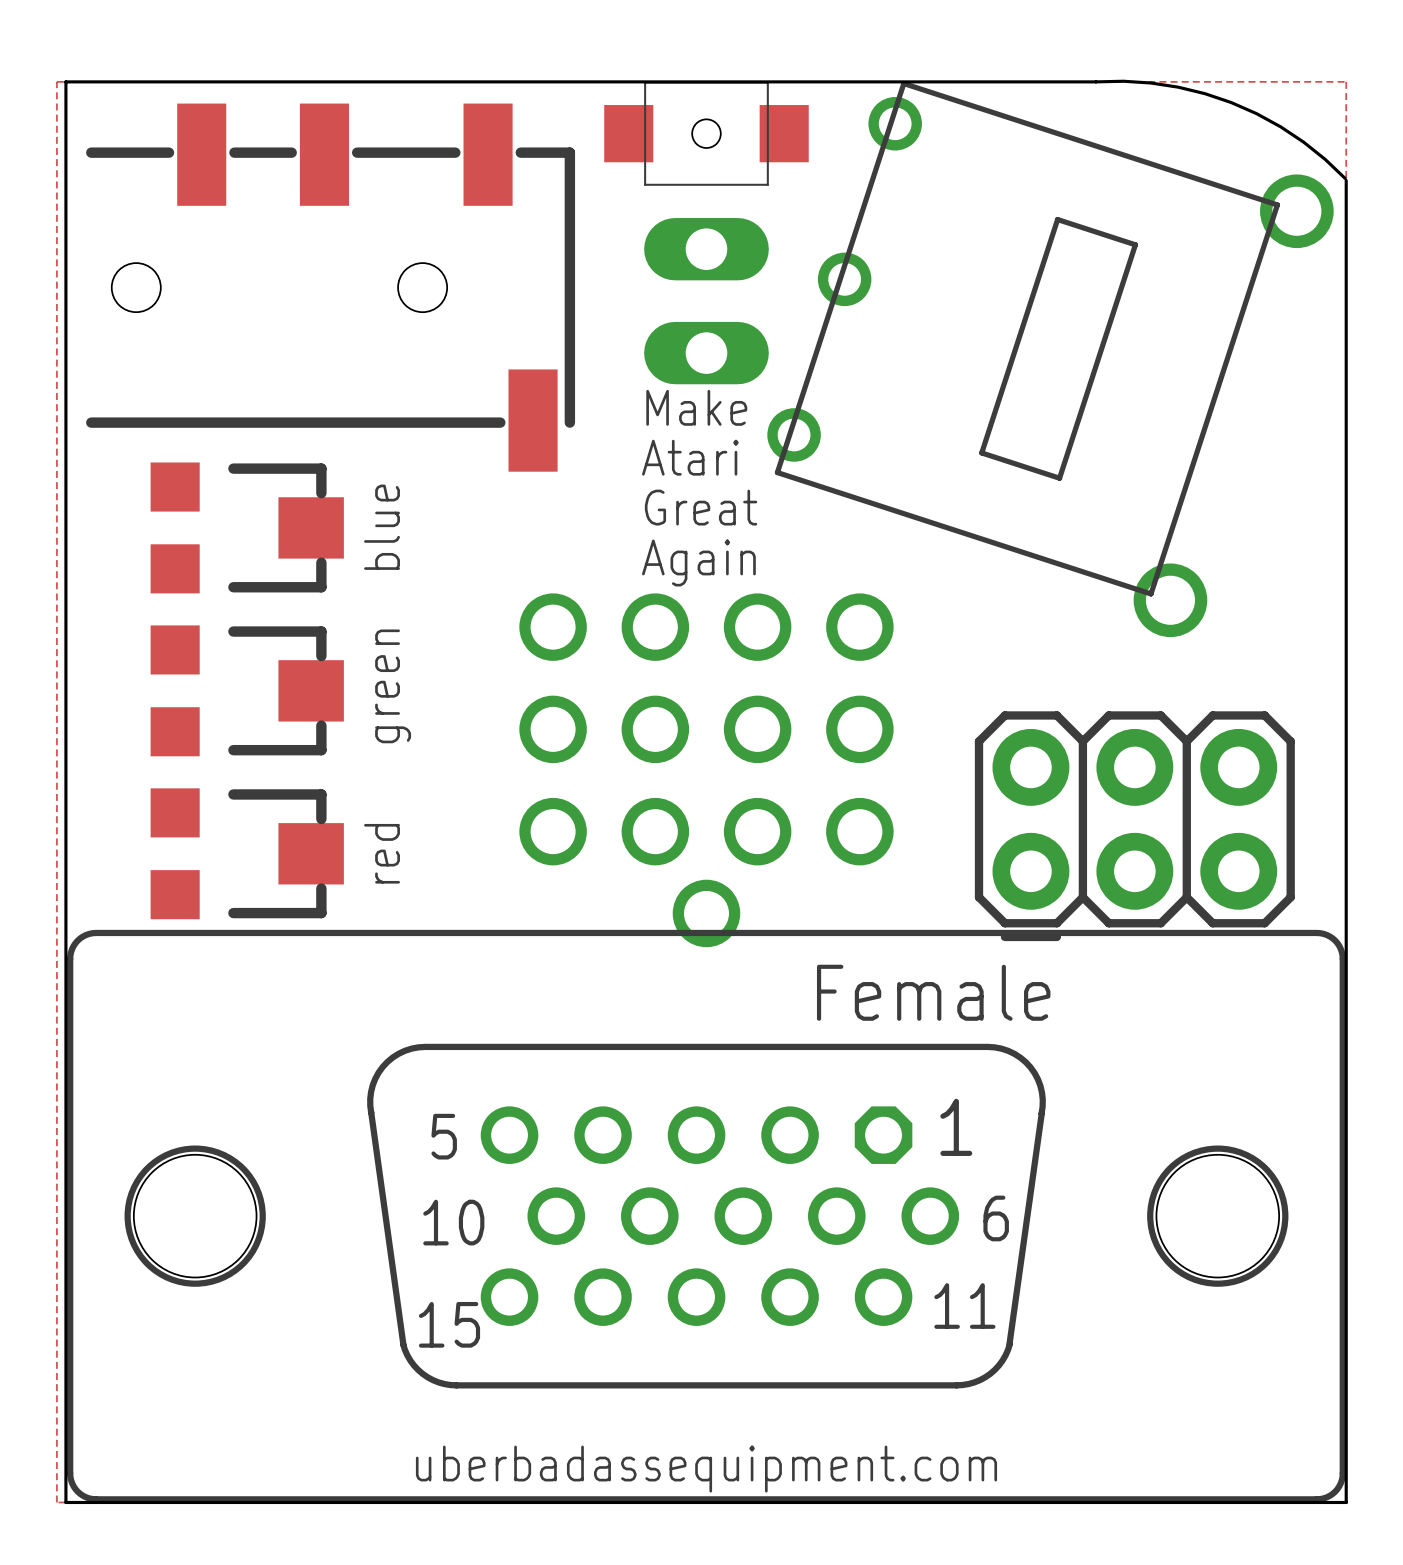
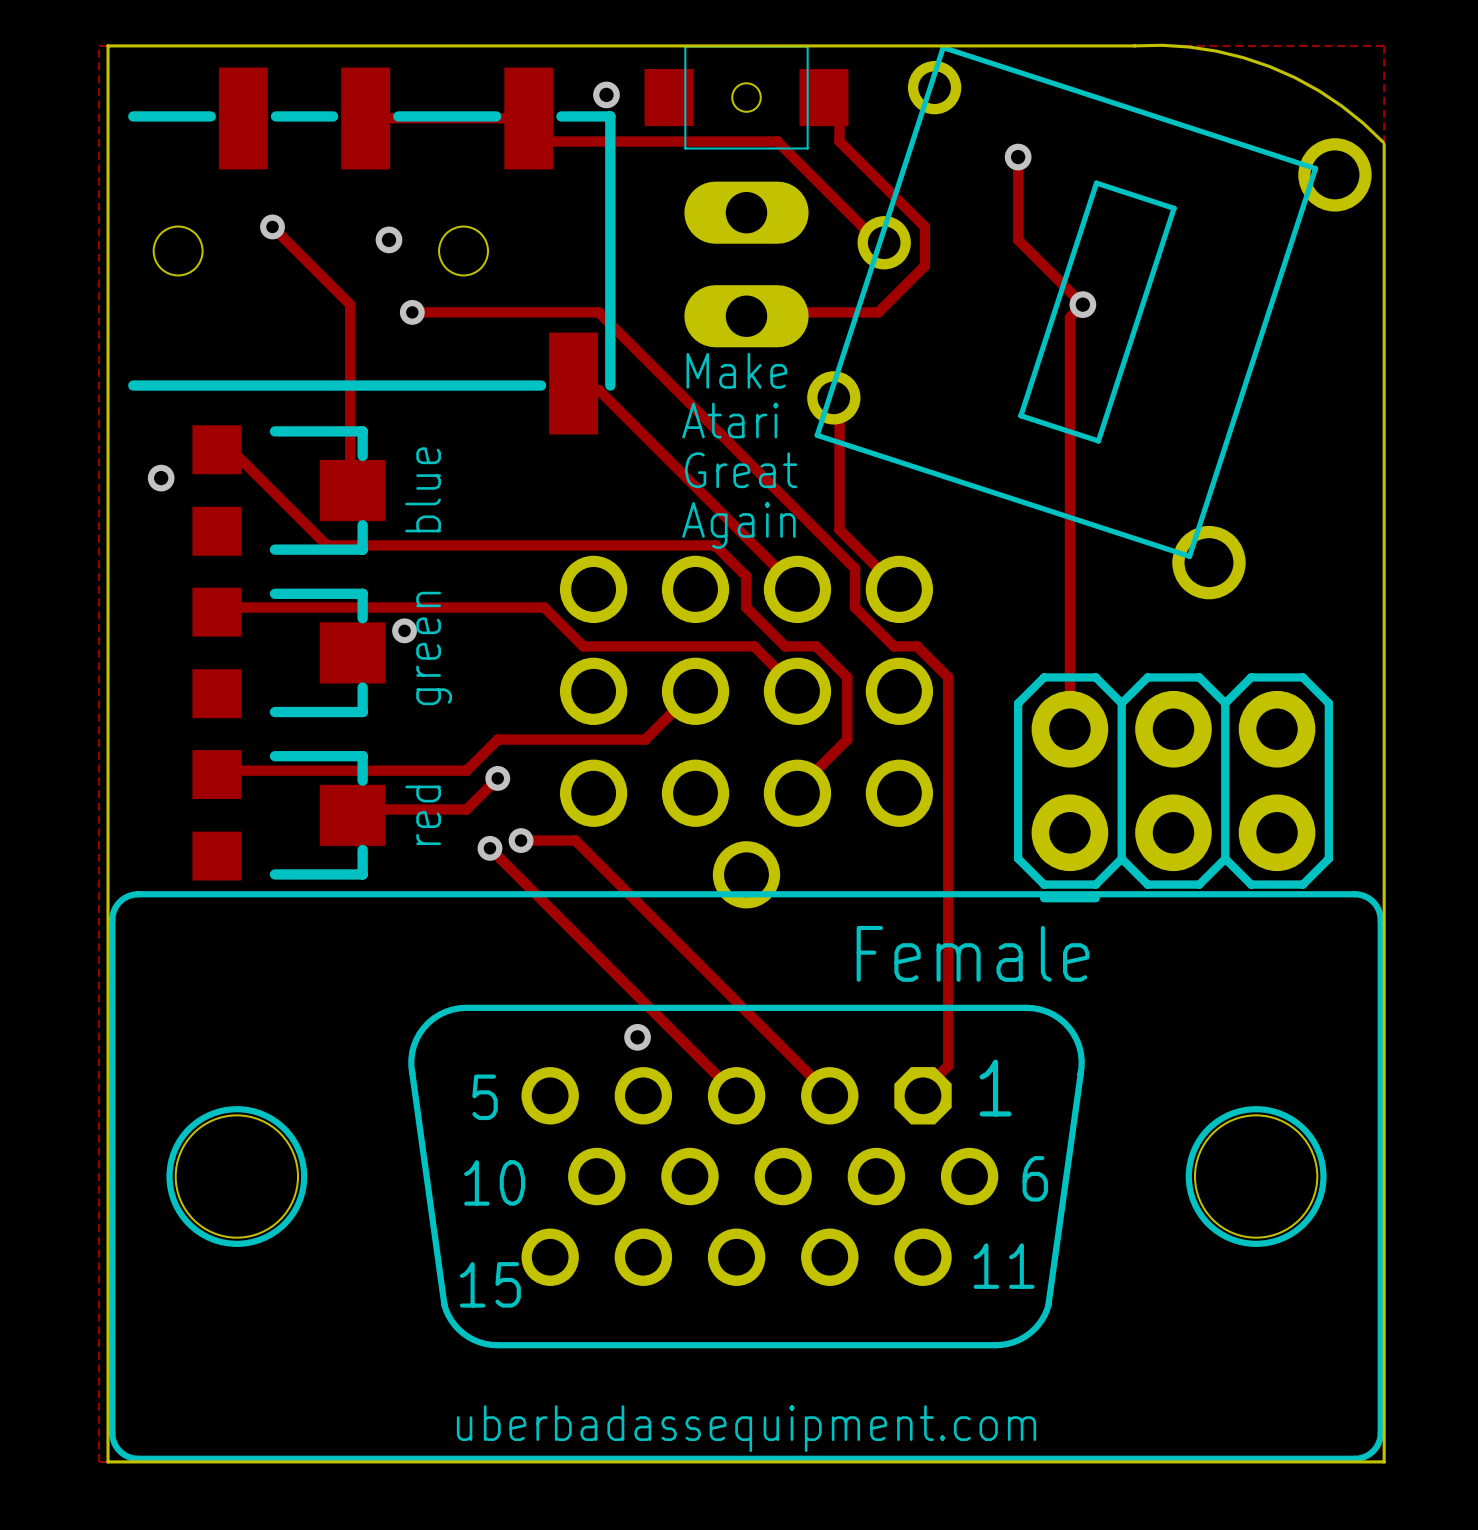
via: none -> (606, 94)
track: none -> (823, 97) (839, 113) (839, 141) (924, 226) (924, 265) (878, 312) (754, 312) (746, 316)
track: none -> (365, 118) (528, 118) (528, 125) (544, 141) (777, 141) (878, 242) (884, 242)
track: none -> (1018, 157) (1018, 239) (1082, 304) (1069, 317) (1069, 729)
via: none -> (1018, 157)
track: none -> (272, 226) (350, 304) (350, 483) (352, 490)
via: none -> (272, 226)
via: none -> (389, 239)
via: none -> (1082, 304)
track: none -> (412, 312) (598, 312) (855, 568) (855, 607) (893, 646) (917, 646) (948, 677) (948, 1065) (924, 1089) (923, 1095)
via: none -> (412, 312)
track: none -> (573, 383) (575, 390) (598, 390) (797, 589)
track: none -> (833, 397) (839, 405) (839, 529) (899, 589)
track: none -> (216, 449) (218, 452) (233, 452) (326, 545) (715, 545) (746, 576) (746, 607) (785, 646) (816, 646) (847, 677) (847, 739) (800, 786) (797, 793)
via: none -> (161, 478)
track: none -> (216, 612) (218, 607) (544, 607) (583, 646) (754, 646) (797, 691)
via: none -> (404, 630)
track: none -> (695, 691) (645, 739) (497, 739) (466, 770) (218, 770) (216, 774)
track: none -> (497, 778) (466, 809) (357, 809) (352, 815)
via: none -> (497, 778)
track: none -> (521, 840) (575, 840) (829, 1095)
via: none -> (521, 840)
track: none -> (489, 848) (736, 1095)
via: none -> (489, 848)
via: none -> (637, 1037)

